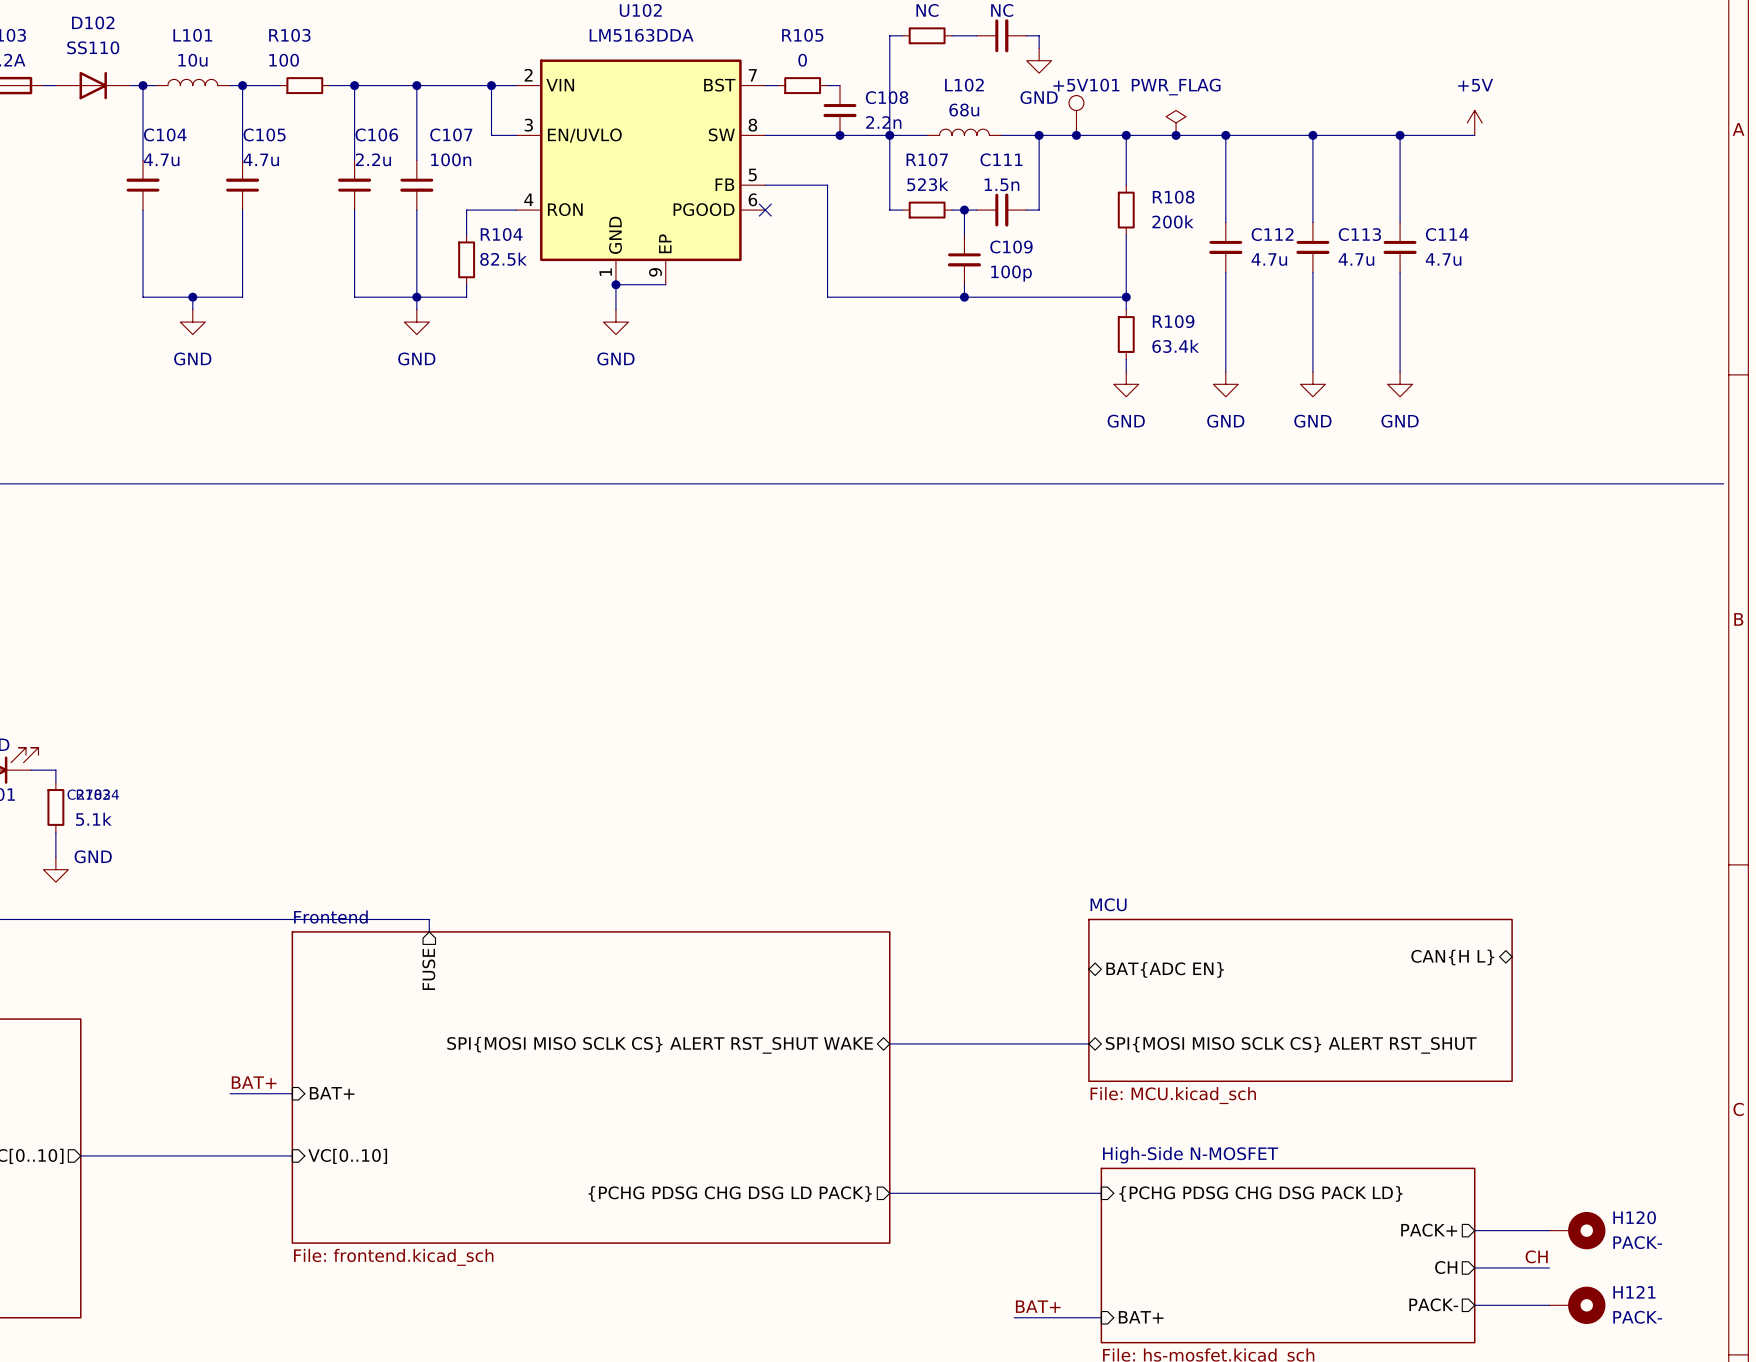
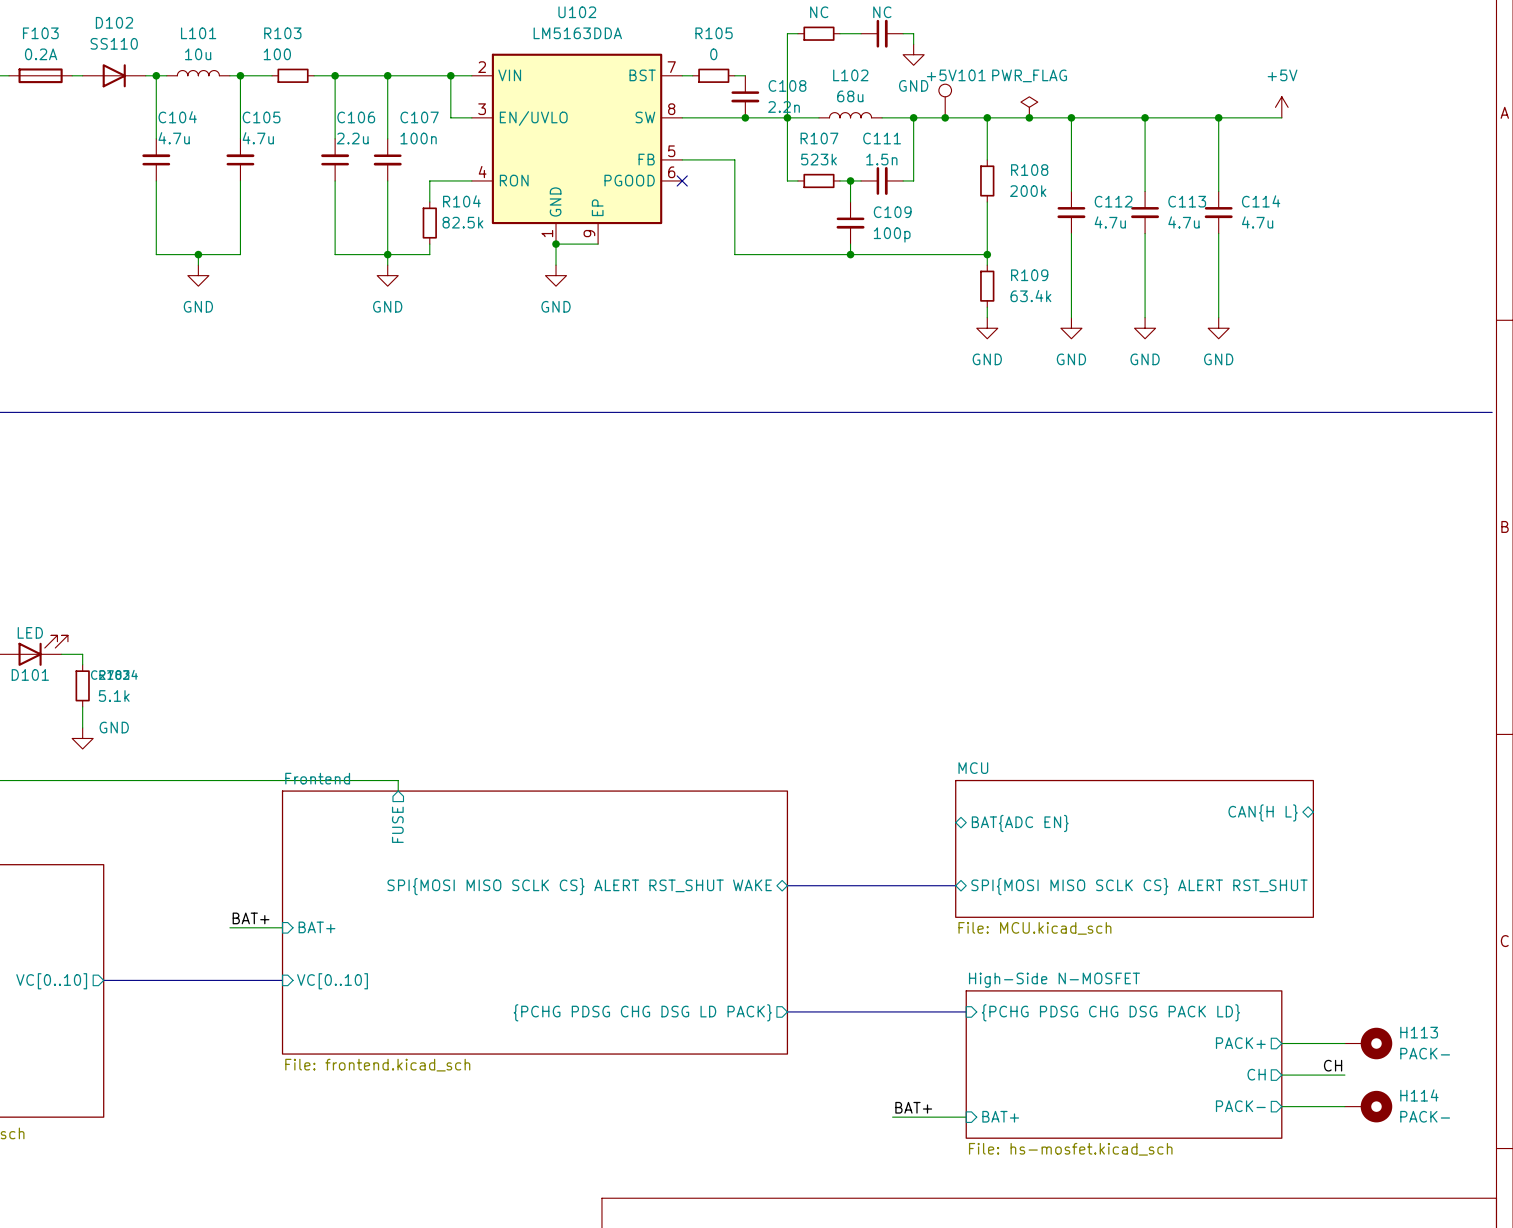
H120 name: H120 (1634, 1217) -> H113 (1419, 1032)
H121 name: H121 (1634, 1292) -> H114 (1419, 1095)

